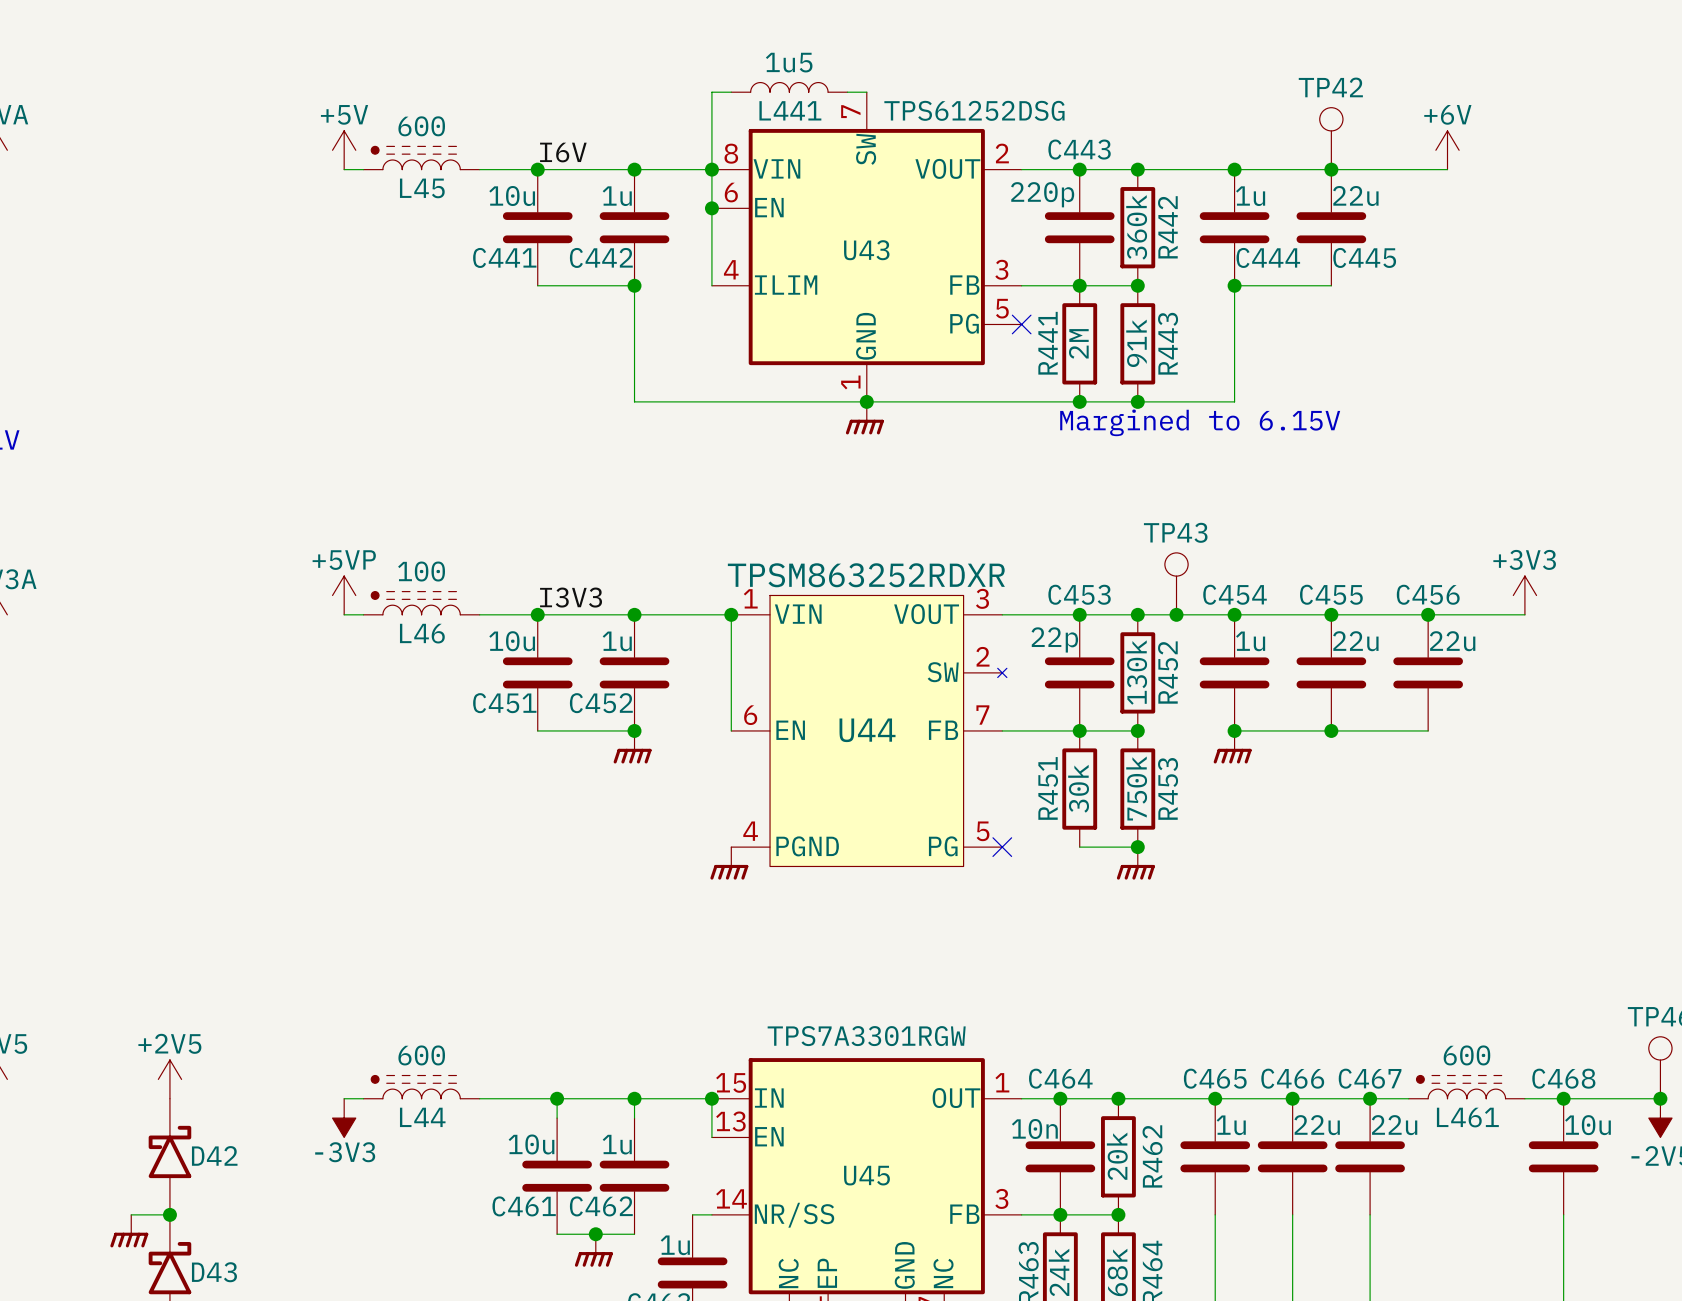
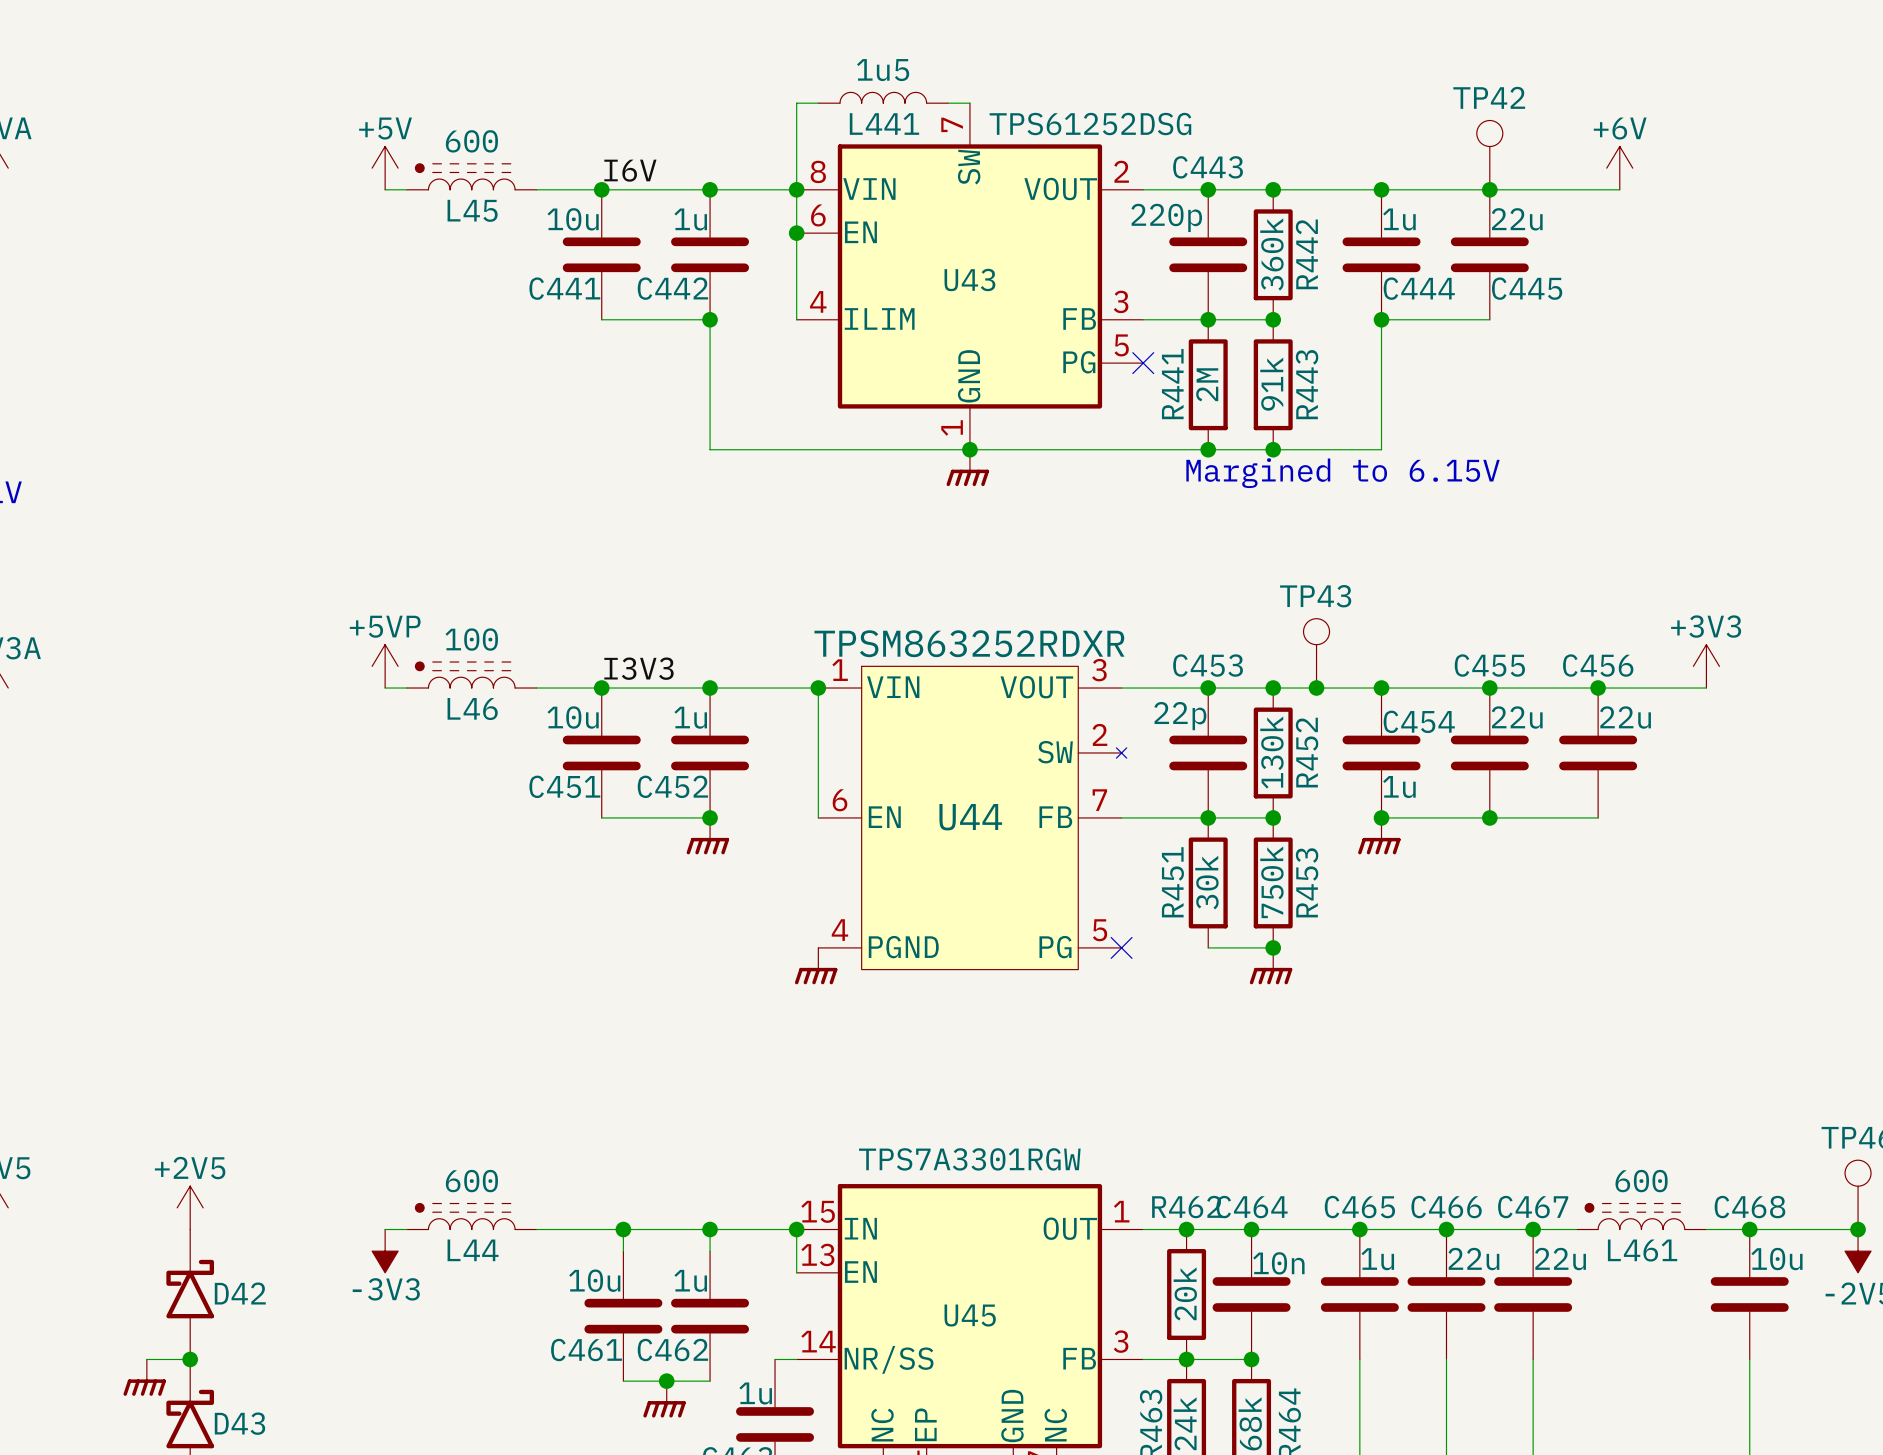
C454 name position: C454 (1235, 594) -> C454 (1419, 721)
C454 value position: 1u (1250, 641) -> 1u (1399, 787)
C464 value position: 10n (1034, 1128) -> 10n (1278, 1263)
C464 position: (1060, 1156) -> (1251, 1294)
R462 position: (1118, 1156) -> (1186, 1294)
R462 name rotation: 0° (1152, 1156) -> 90° clockwise (1186, 1207)

